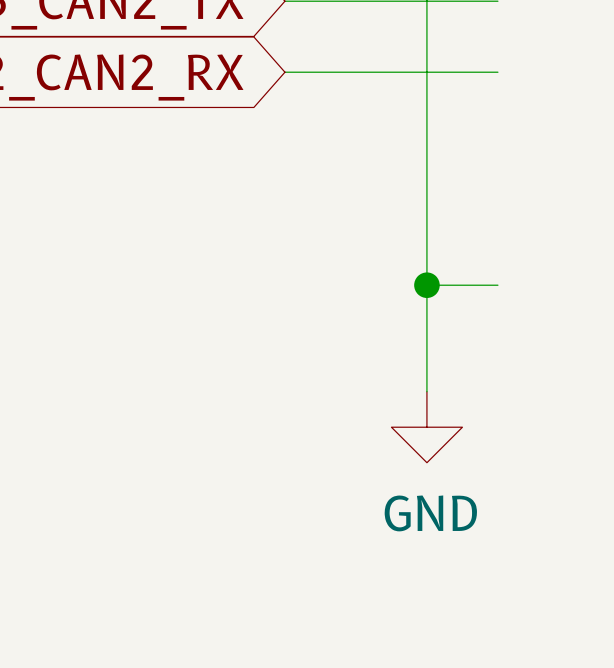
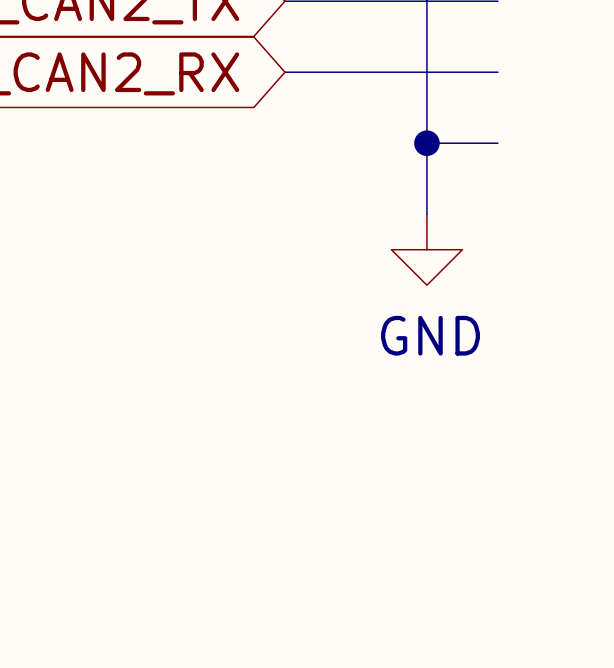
wire: (426, 214) (426, 391) -> none
wire: (426, 285) (497, 285) -> (426, 143) (497, 143)
junction position: (426, 285) -> (426, 143)
power symbol position: GND (426, 427) -> GND (426, 249)

